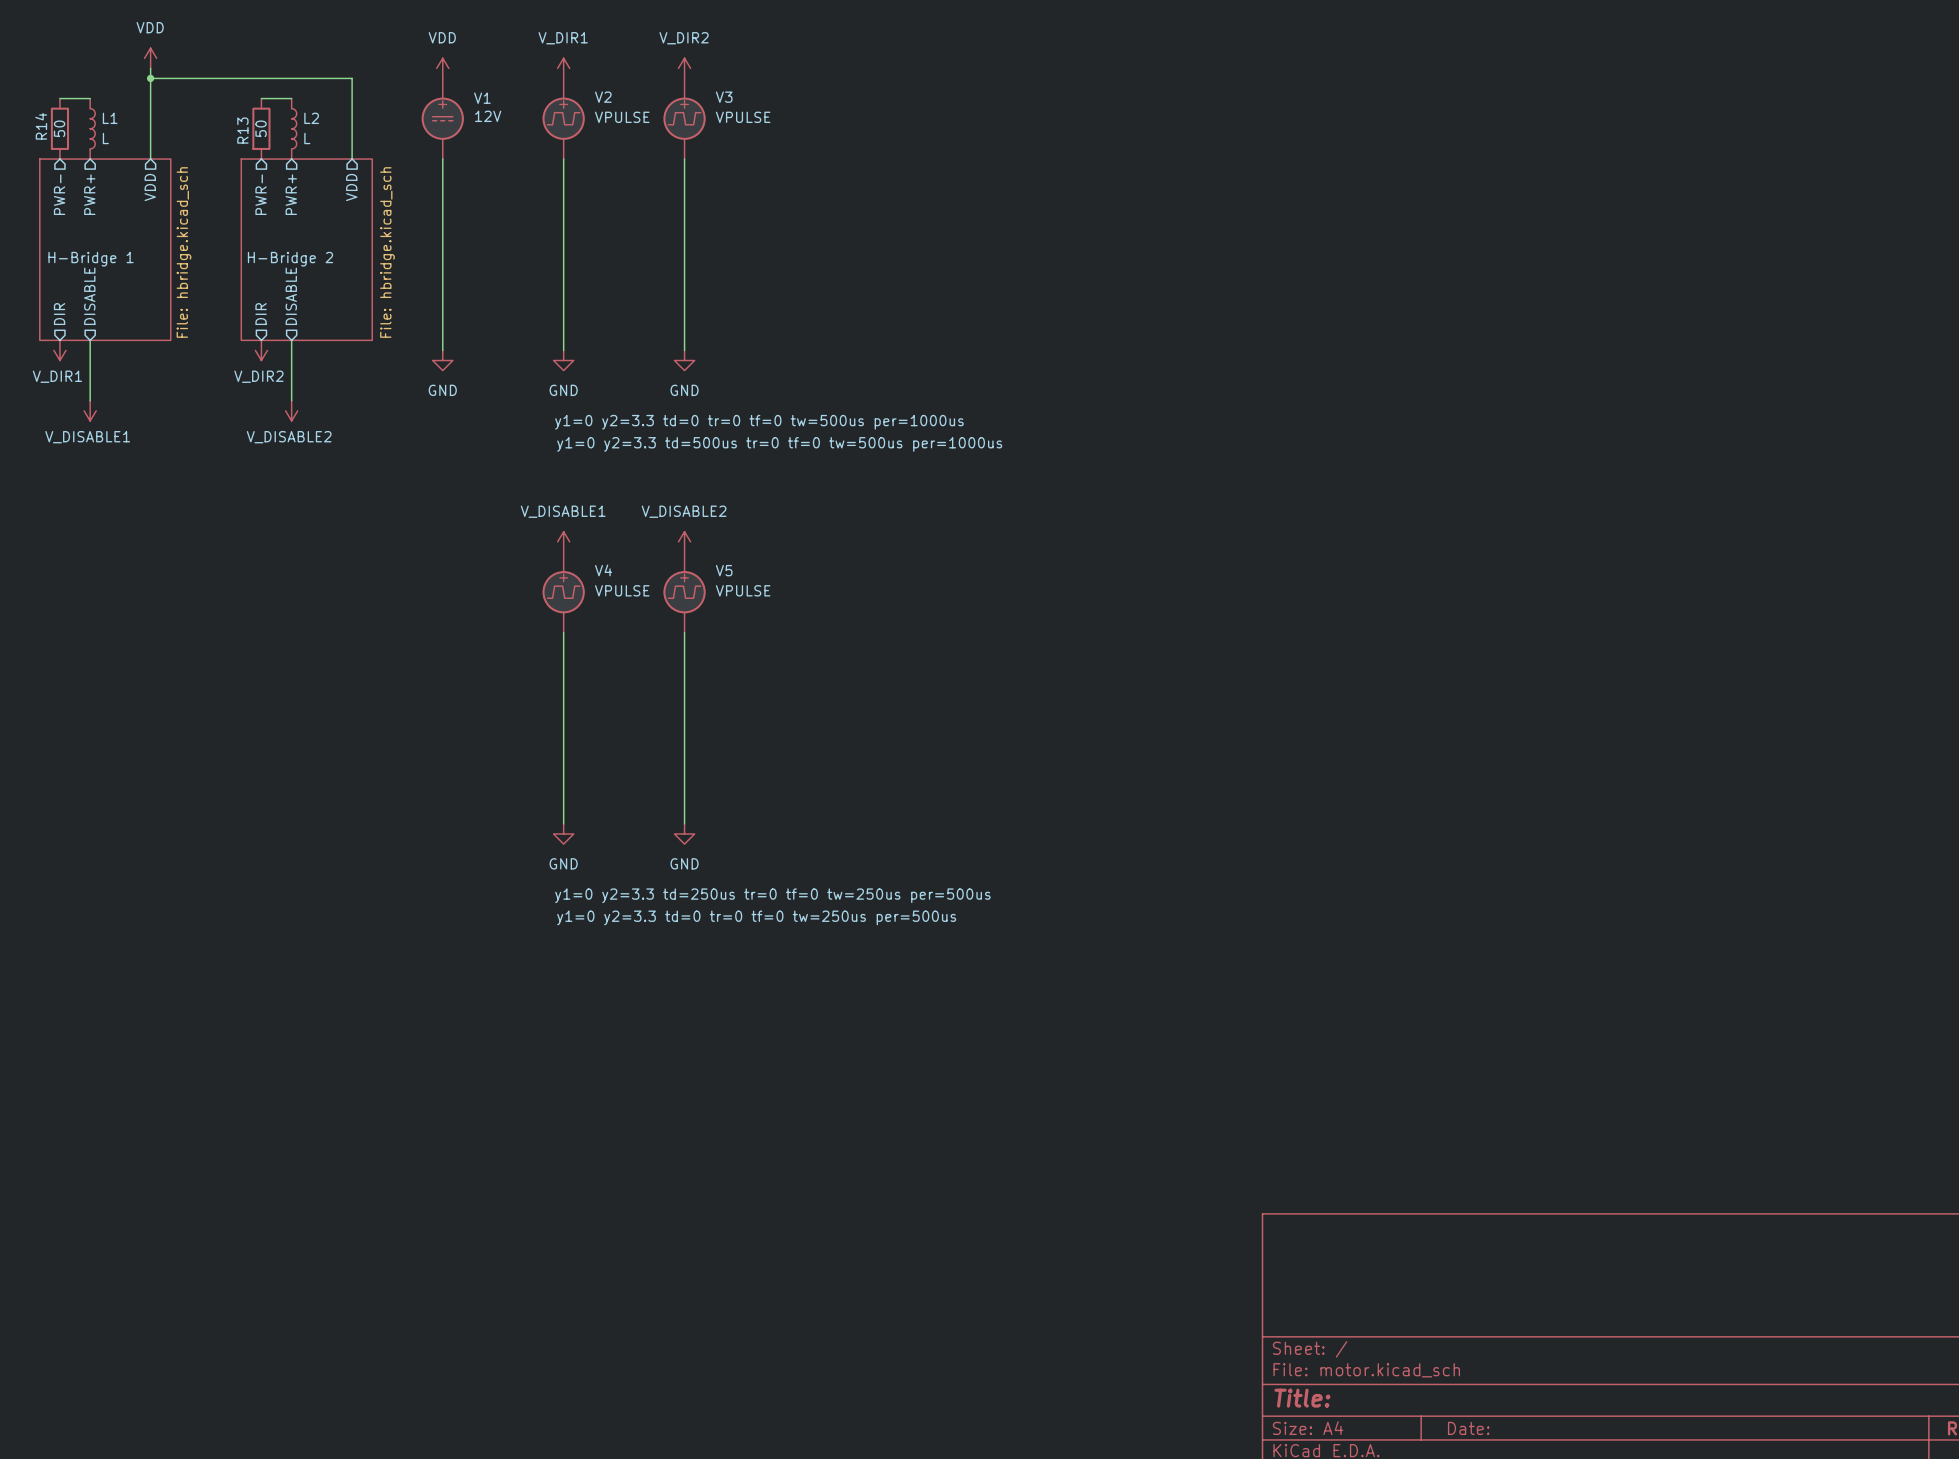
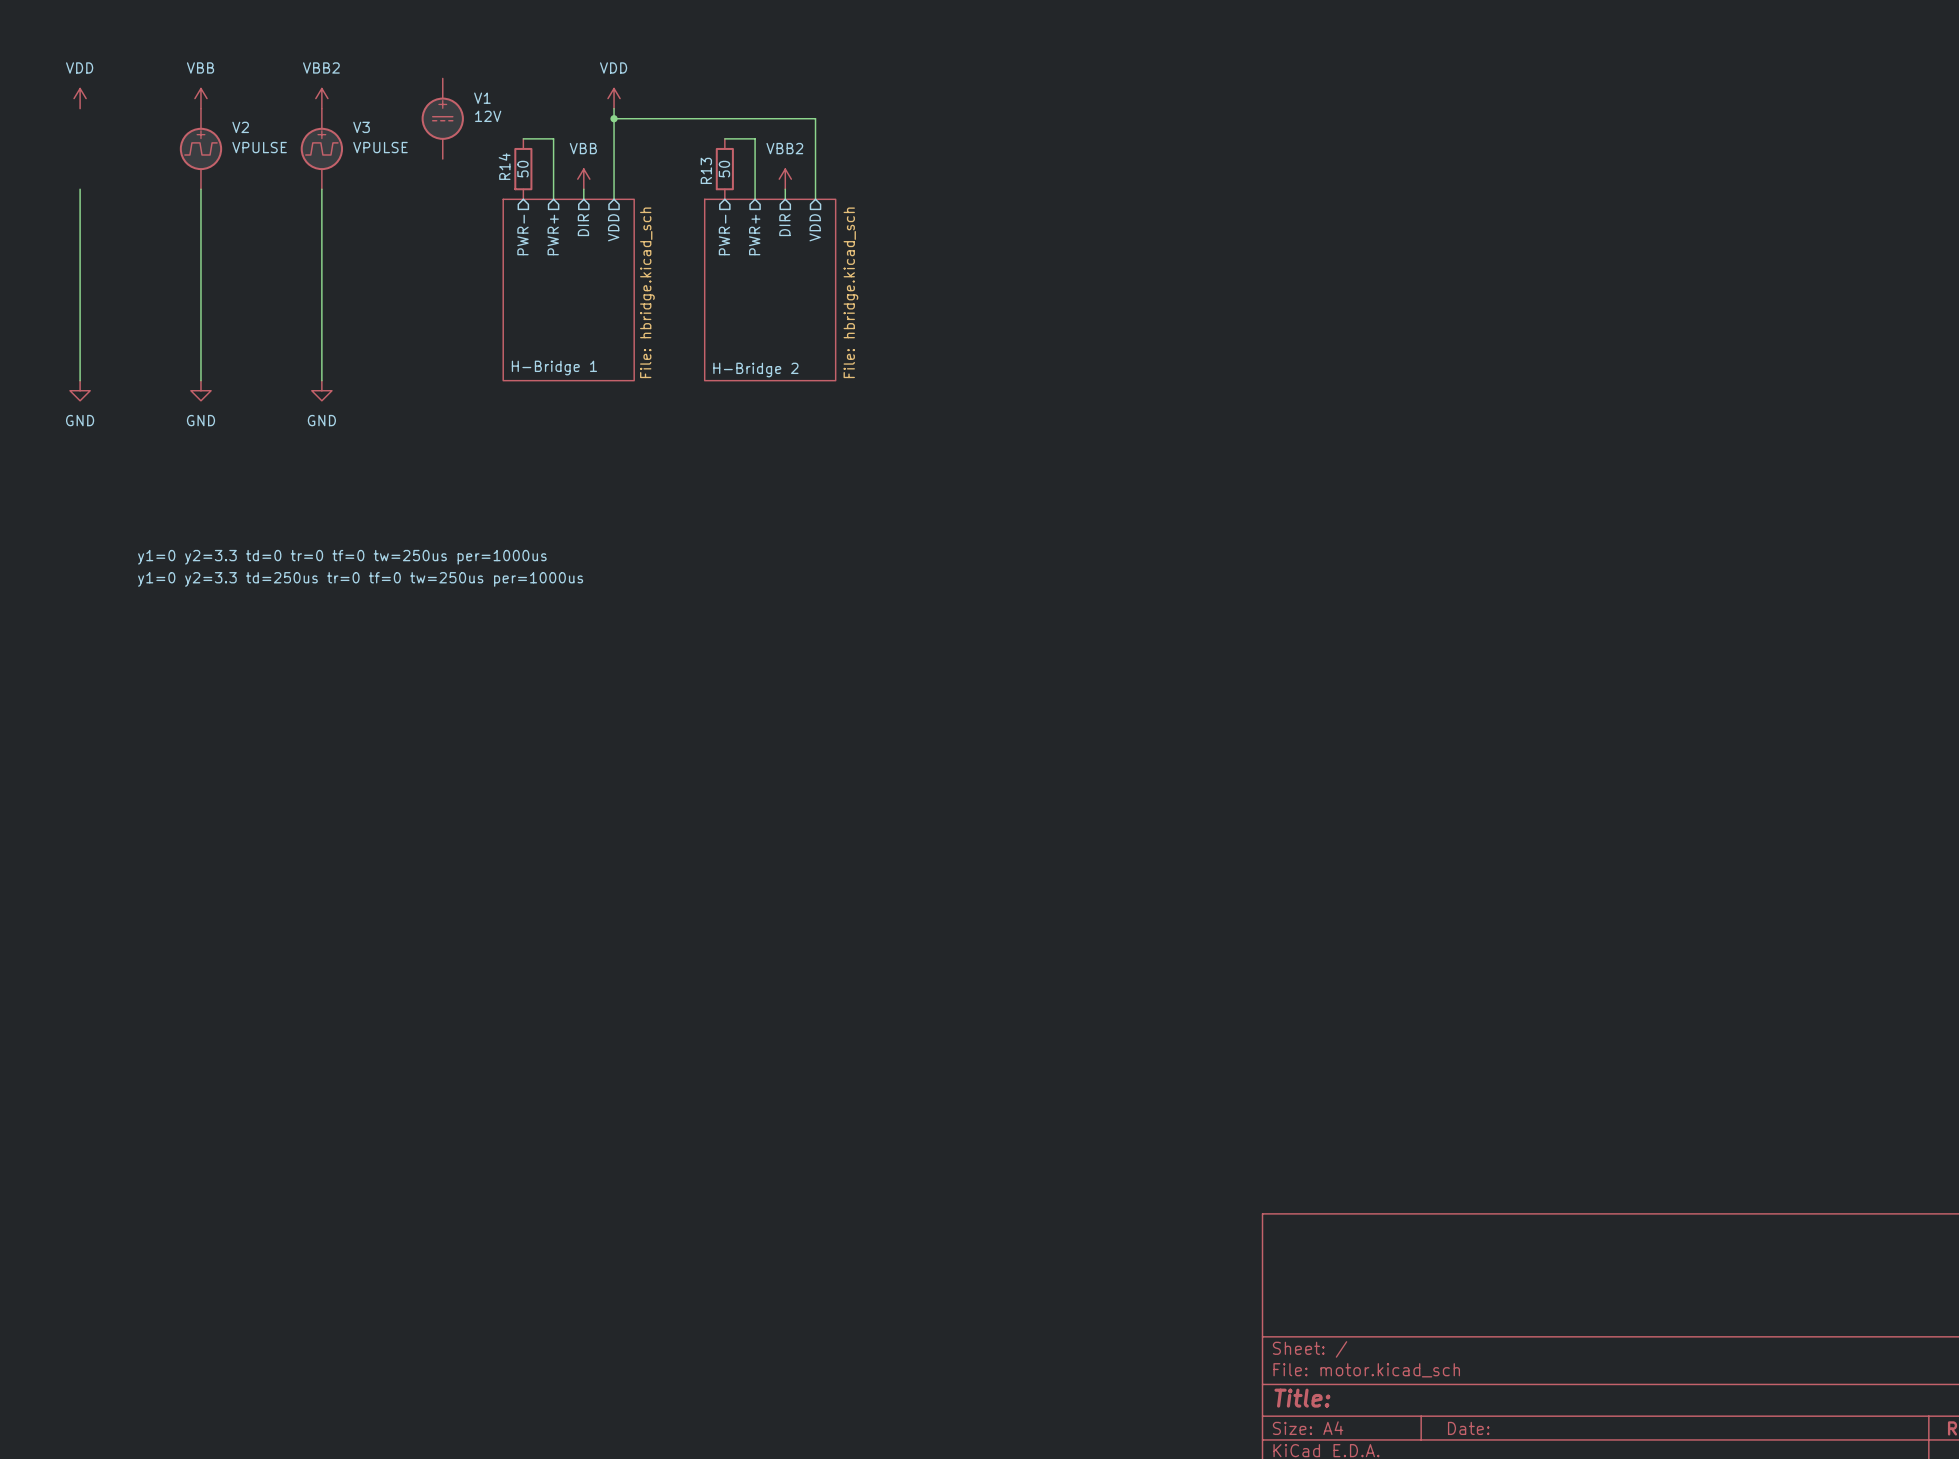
power symbol position: VDD (150, 58) -> VDD (80, 98)
wire: (150, 68) (150, 159) -> none
power symbol position: VDD (442, 68) -> VDD (614, 98)
power symbol: V_DIR1 (563, 68) -> none
power symbol: V_DIR2 (684, 68) -> none
wire: (150, 78) (352, 78) (352, 159) -> none
junction: (150, 78) -> none
wire: (59, 98) (90, 98) -> none
power symbol: none -> VBB (200, 98)
wire: (261, 98) (291, 98) -> none
power symbol: none -> VBB2 (321, 98)
wire: none -> (614, 108) (614, 199)
V2 position: (563, 118) -> (200, 148)
wire: none -> (614, 118) (815, 118) (815, 199)
junction: none -> (614, 118)
V3 position: (684, 118) -> (321, 148)
R14 position: (59, 128) -> (523, 169)
L1: L (92, 128) -> none
R13 position: (261, 128) -> (724, 169)
L2: L (294, 128) -> none
wire: none -> (523, 138) (553, 138) (553, 199)
wire: none -> (724, 138) (755, 138) (755, 199)
wire: (442, 159) (442, 350) -> (321, 189) (321, 380)
wire: (563, 159) (563, 350) -> none
wire: (684, 159) (684, 350) -> none
power symbol: none -> VBB (583, 179)
power symbol: none -> VBB2 (785, 179)
sheet pin: VDD (150, 187) -> none
sheet pin: VDD (351, 187) -> none
wire: none -> (80, 189) (80, 380)
wire: none -> (200, 189) (200, 380)
wire: none -> (583, 189) (583, 199)
wire: none -> (785, 189) (785, 199)
sheet pin: PWR- (59, 194) -> none
sheet pin: PWR+ (89, 194) -> none
sheet pin: PWR- (261, 194) -> none
sheet pin: PWR+ (291, 194) -> none
sheet pin: none -> DIR (583, 225)
sheet pin: none -> DIR (784, 225)
sheet pin: none -> VDD (613, 227)
sheet pin: none -> VDD (815, 227)
sheet pin: none -> PWR- (522, 234)
sheet pin: none -> PWR+ (553, 234)
sheet pin: none -> PWR- (724, 234)
sheet pin: none -> PWR+ (754, 234)
sheet H-Bridge 1 position: (105, 249) -> (568, 289)
sheet H-Bridge 2 position: (306, 249) -> (770, 289)
sheet H-Bridge 1 name position: H-Bridge 1 (91, 259) -> H-Bridge 1 (554, 368)
sheet H-Bridge 2 name position: H-Bridge 2 (290, 259) -> H-Bridge 2 (755, 370)
sheet pin: DISABLE (89, 296) -> none
sheet pin: DISABLE (291, 296) -> none
sheet pin: DIR (59, 314) -> none
sheet pin: DIR (261, 314) -> none
wire: (90, 340) (90, 400) -> none
wire: (291, 340) (291, 400) -> none
power symbol: V_DIR1 (59, 350) -> none
power symbol: V_DIR2 (261, 350) -> none
power symbol: GND (442, 360) -> none
power symbol: GND (563, 360) -> none
power symbol: GND (684, 360) -> none
power symbol: none -> GND (80, 390)
power symbol: none -> GND (200, 390)
power symbol: none -> GND (321, 390)
power symbol: V_DISABLE1 (90, 410) -> none
power symbol: V_DISABLE2 (291, 410) -> none
V3 text: y1=0 y2=3.3 td=0 tr=0 tf=0 tw=500us per=1000us (759, 422) -> y1=0 y2=3.3 td=0 tr=0 tf=0 tw=250us per=1000us (342, 557)
V2 text: y1=0 y2=3.3 td=500us tr=0 tf=0 tw=500us per=1000us (779, 444) -> y1=0 y2=3.3 td=250us tr=0 tf=0 tw=250us per=1000us (360, 579)
power symbol: V_DISABLE1 (563, 541) -> none
power symbol: V_DISABLE2 (684, 541) -> none
V4: VPULSE (563, 592) -> none
V5: VPULSE (684, 592) -> none
wire: (563, 632) (563, 823) -> none
wire: (684, 632) (684, 823) -> none
power symbol: GND (563, 834) -> none
power symbol: GND (684, 834) -> none

